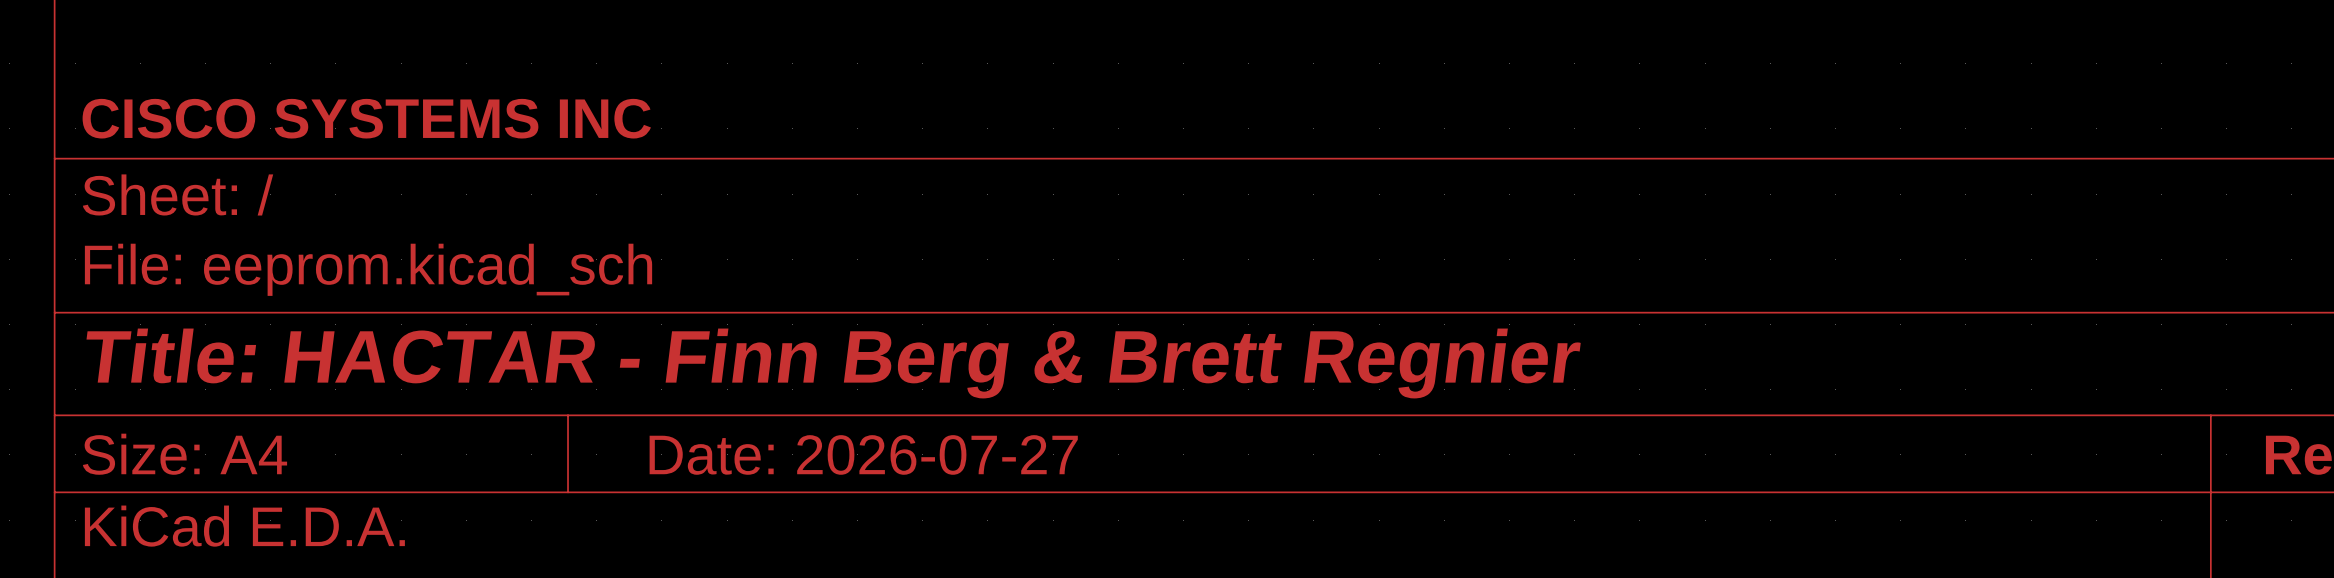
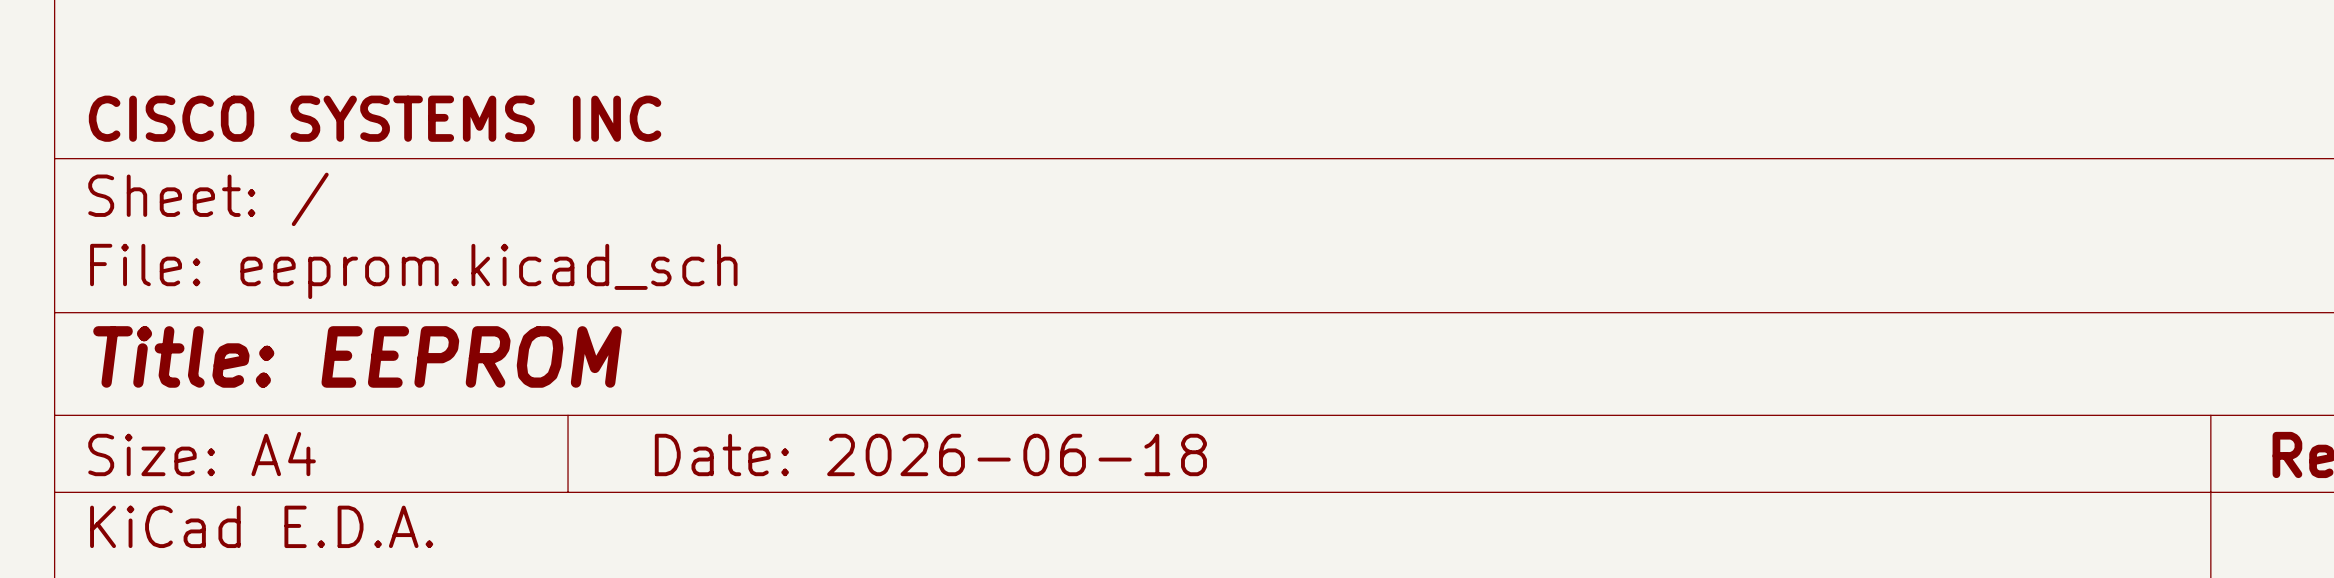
title block: Title: HACTAR - Finn Berg & Brett Regnier (833, 363) -> Title: EEPROM (357, 356)
title block: Date: 2026-07-27 (863, 454) -> Date: 2026-06-18 (930, 454)

